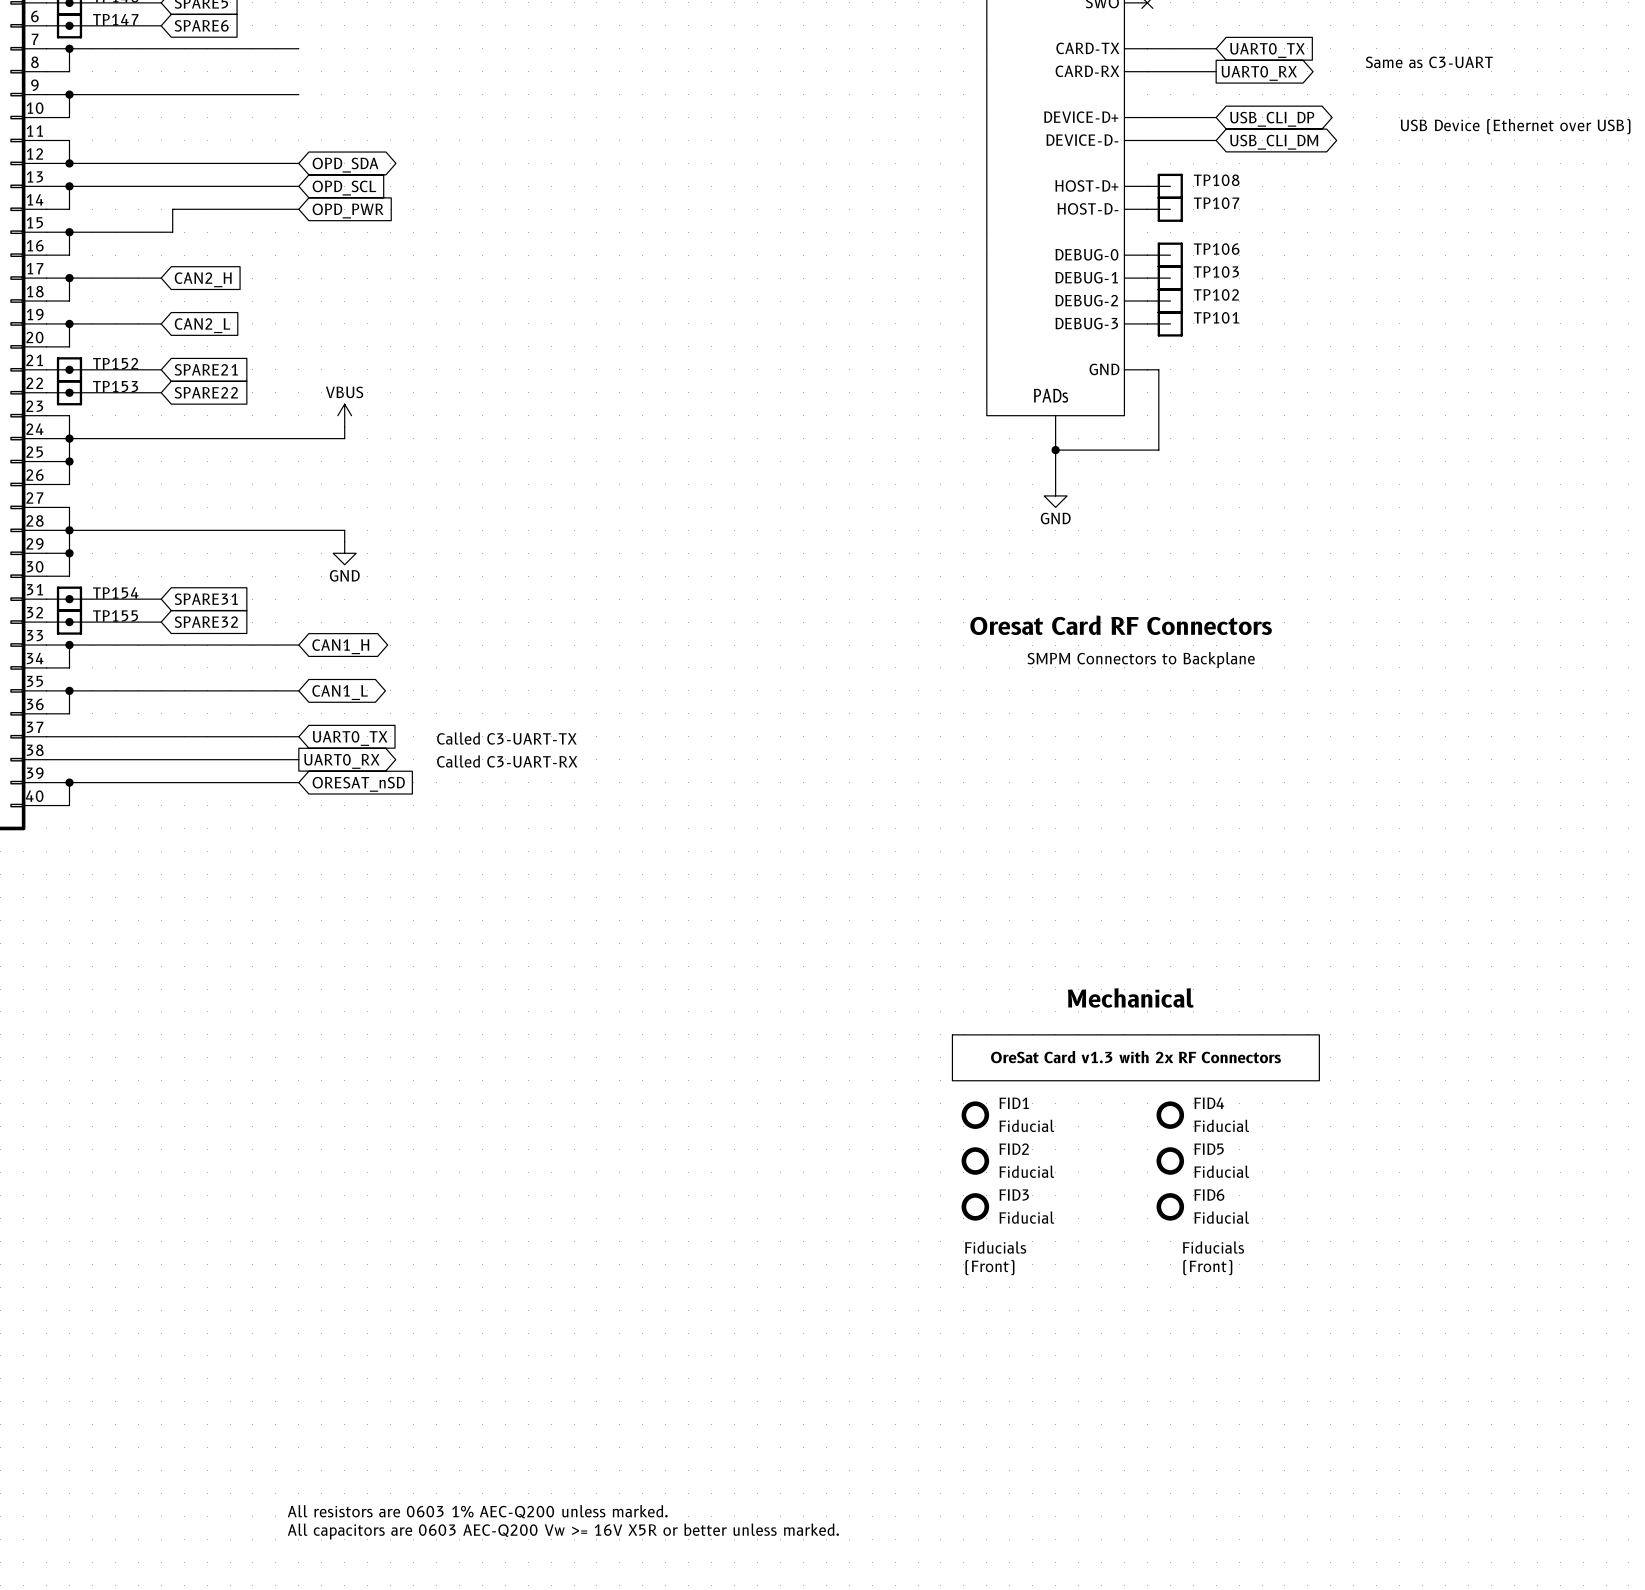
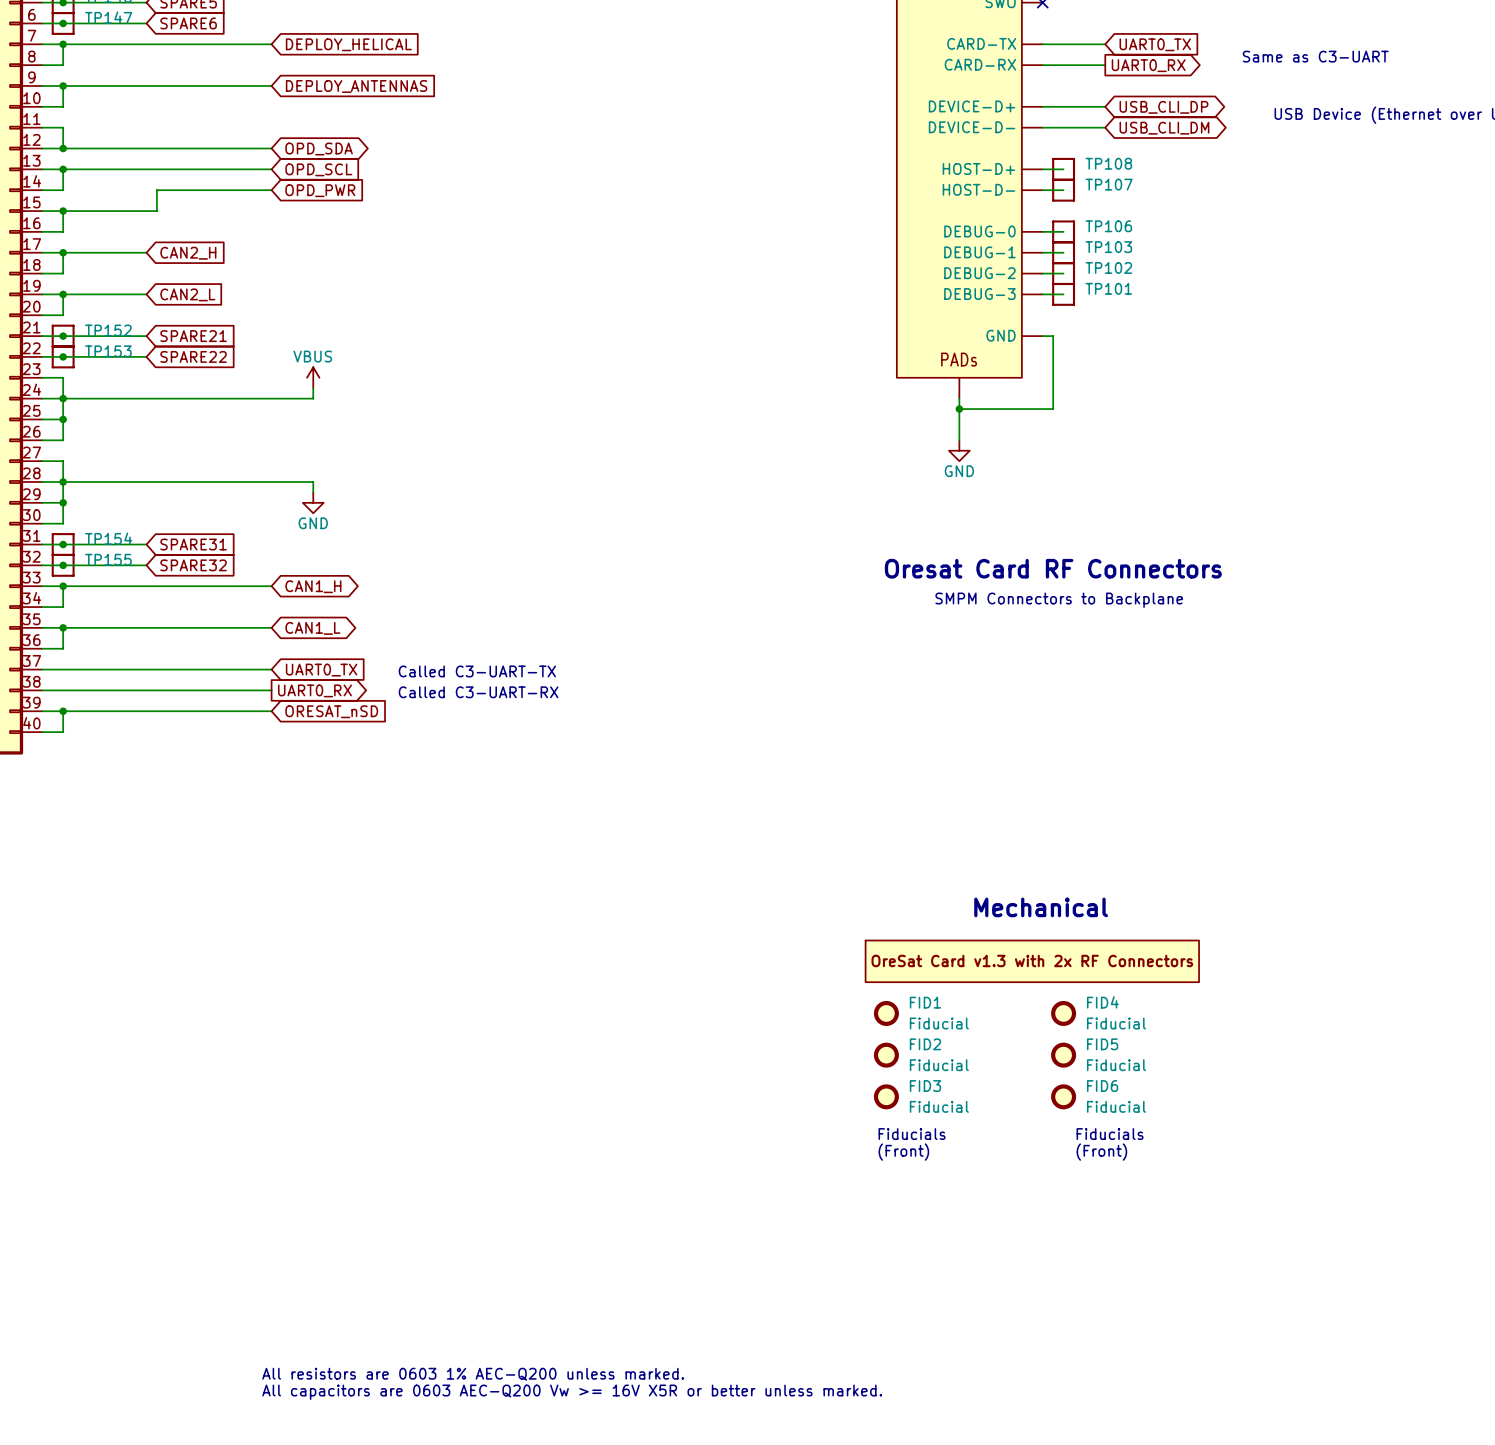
global label: none -> DEPLOY_HELICAL (348, 44)
global label: none -> DEPLOY_ANTENNAS (356, 86)

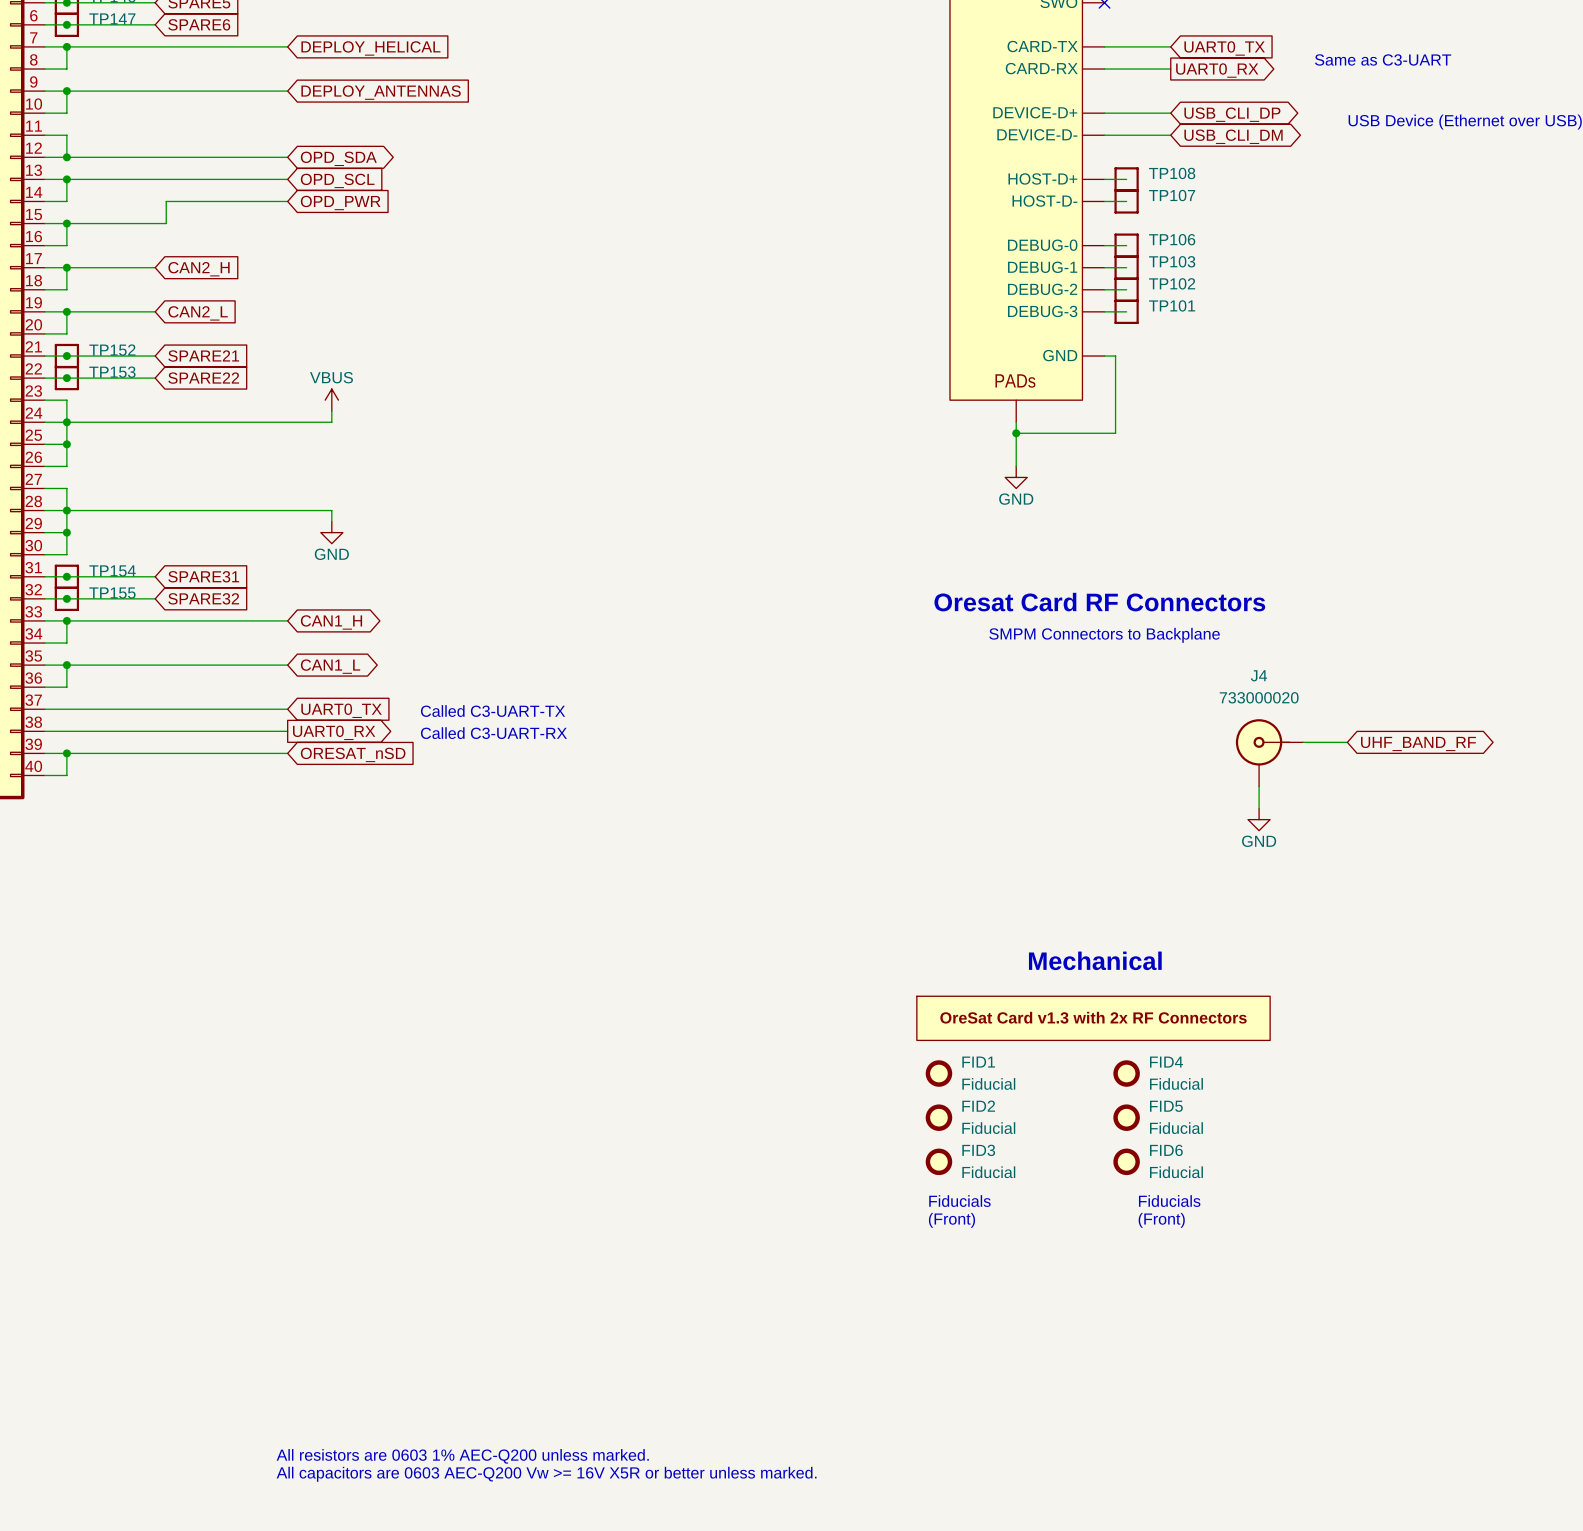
wire: none -> (1303, 742) (1347, 742)
global label: none -> UHF_BAND_RF (1418, 743)
J4: none -> 733000020 (1269, 752)
wire: none -> (1259, 786) (1259, 808)
power symbol: none -> GND (1259, 819)

